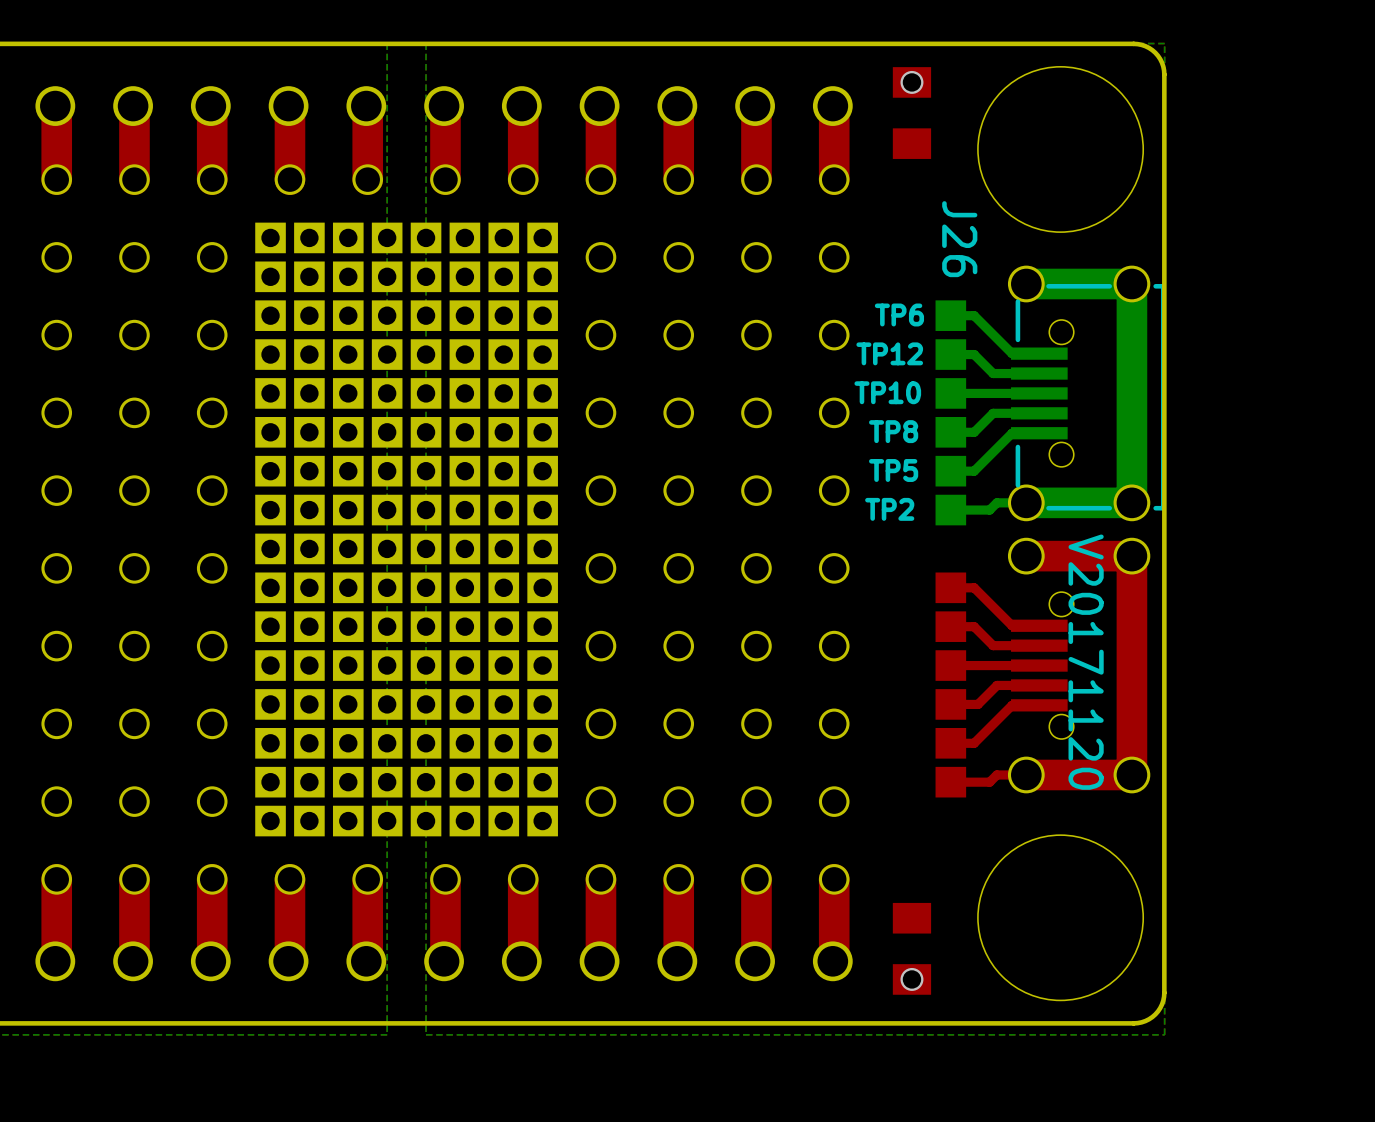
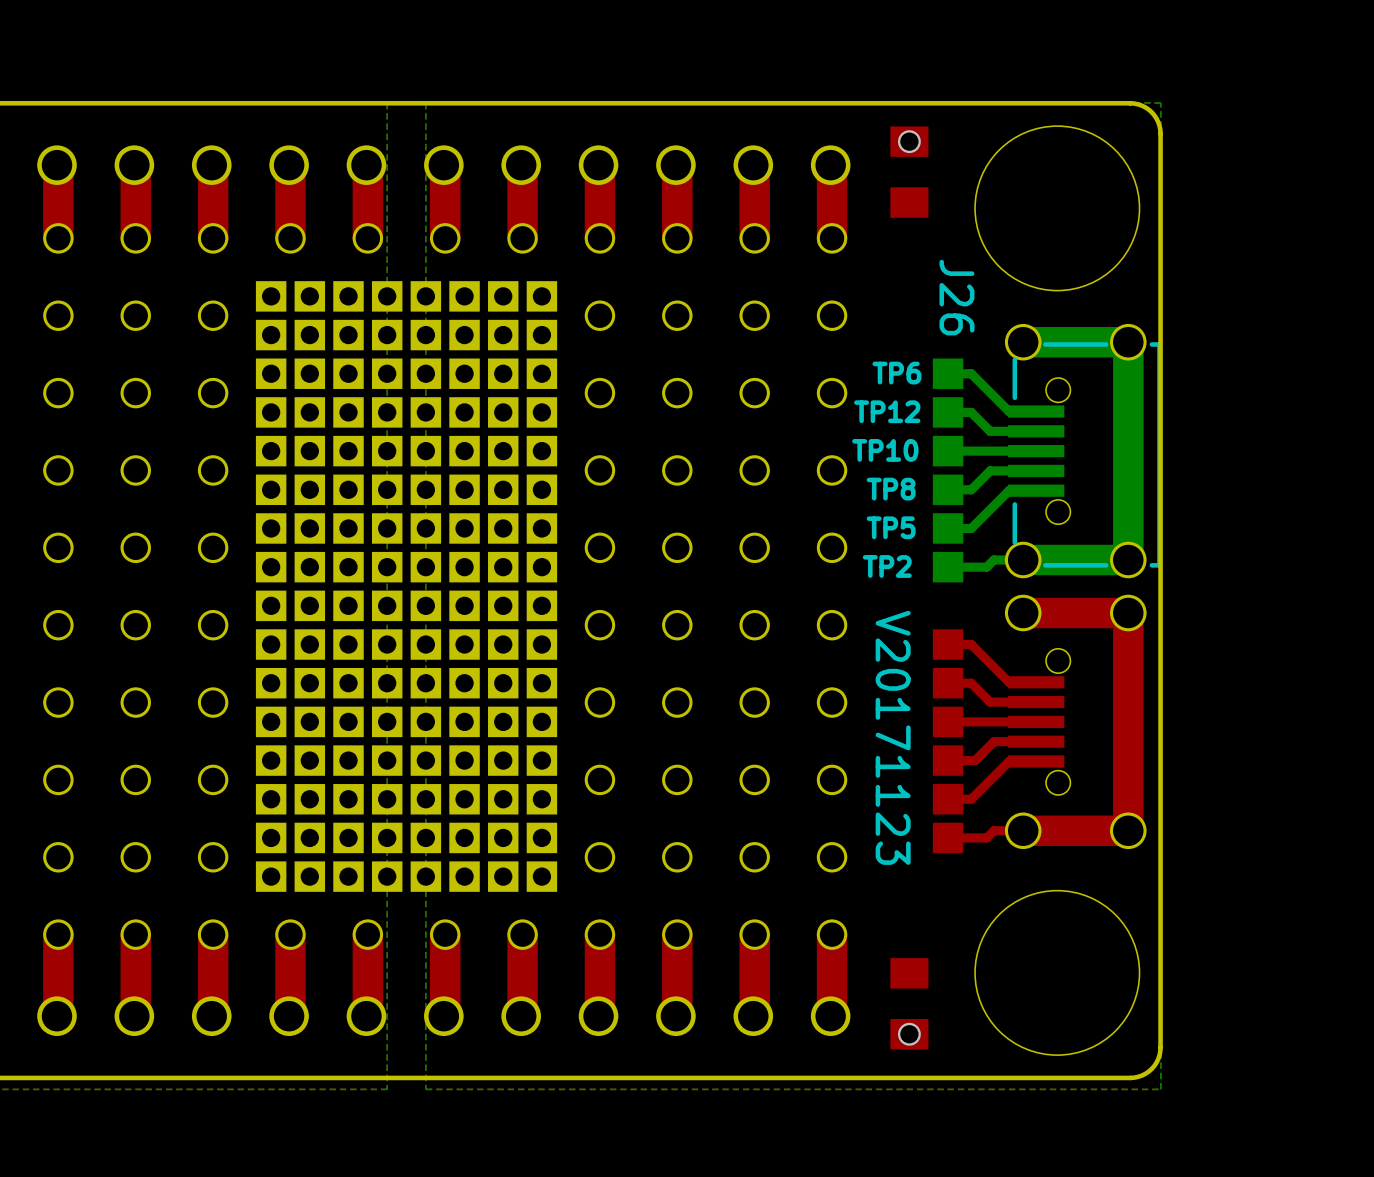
drawing: [1068, 534, 1104, 790] -> none
drawing: none -> [875, 610, 911, 865]

